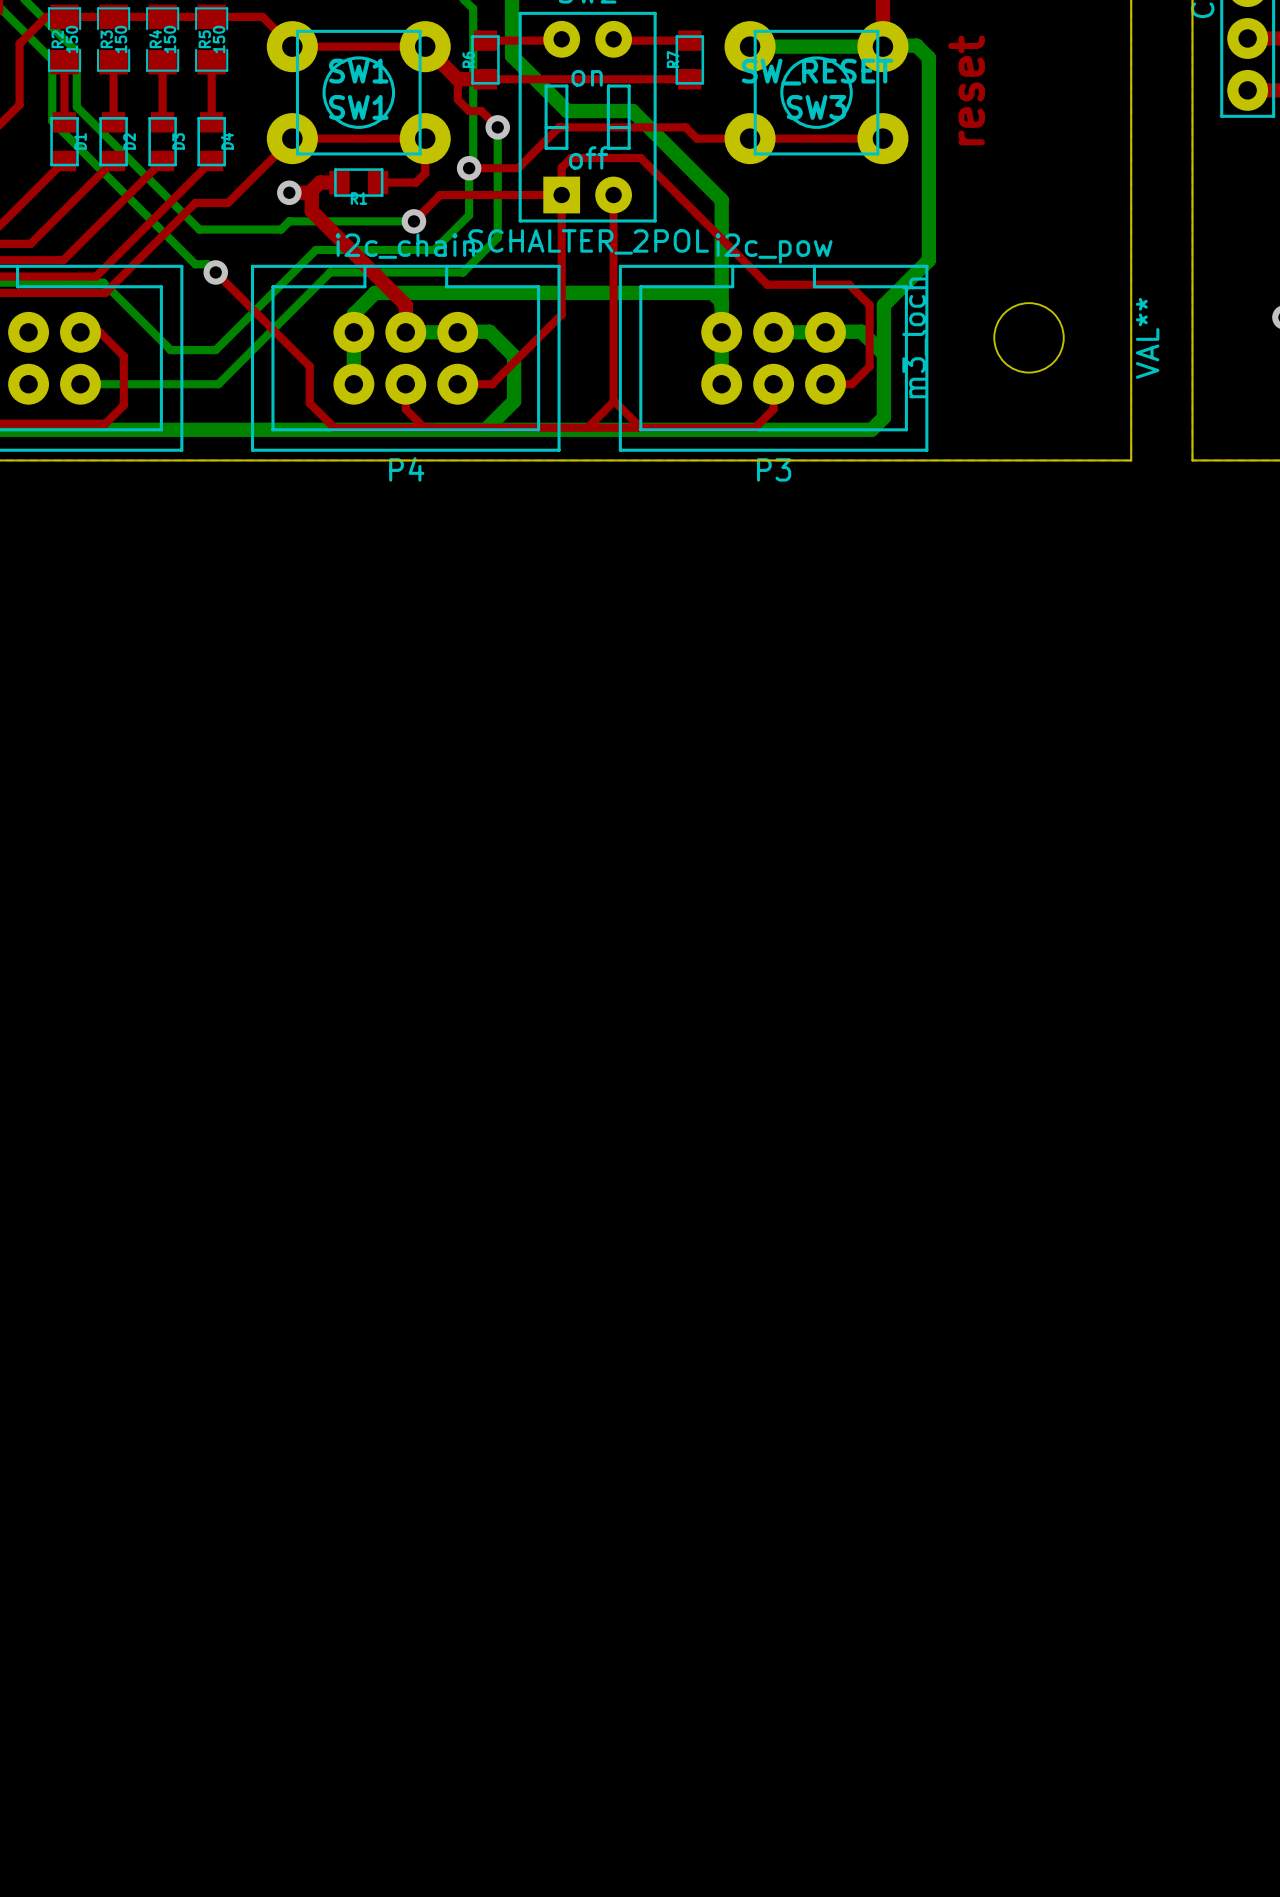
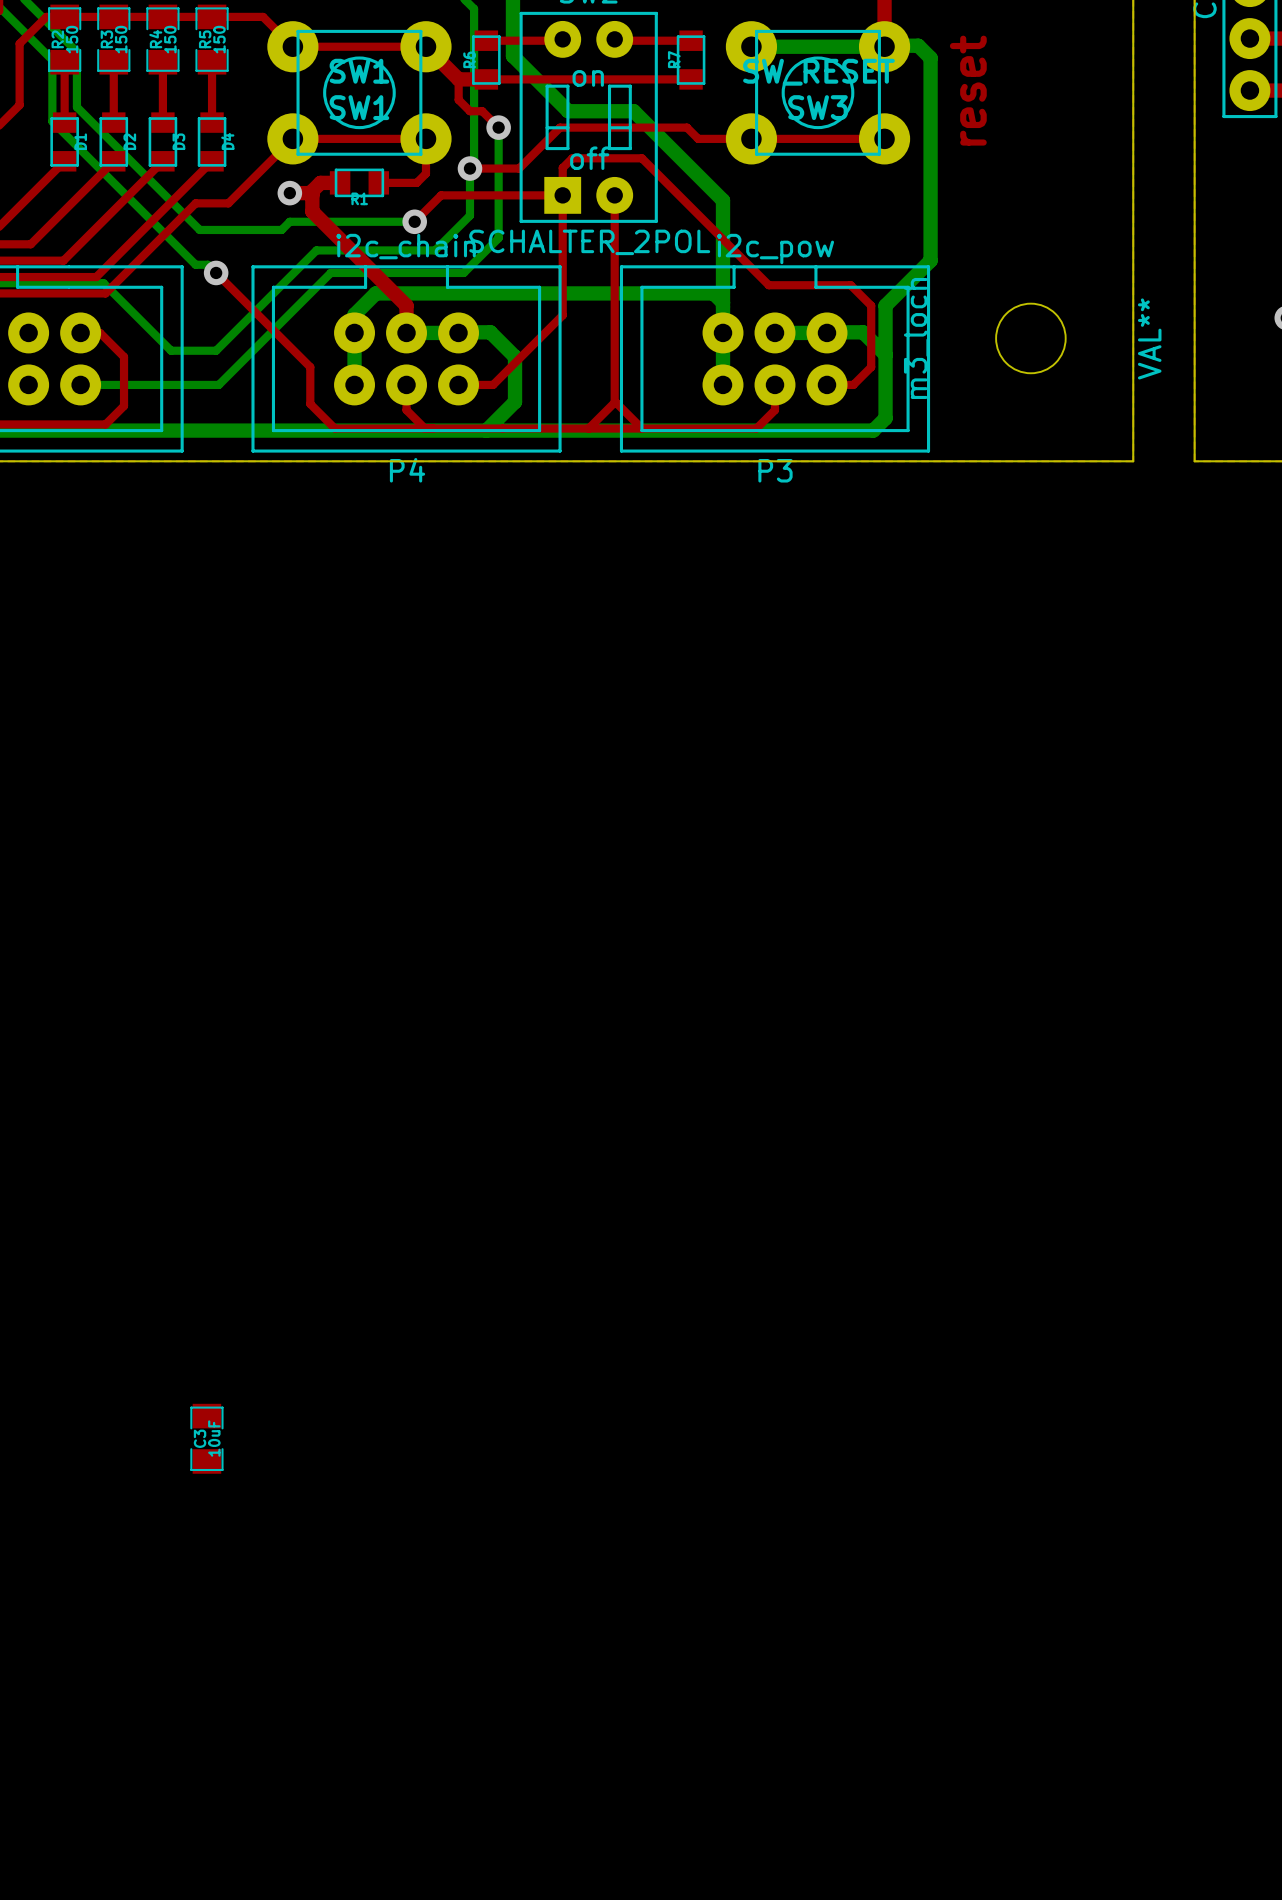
C3: none -> 10uF (206, 1438)

